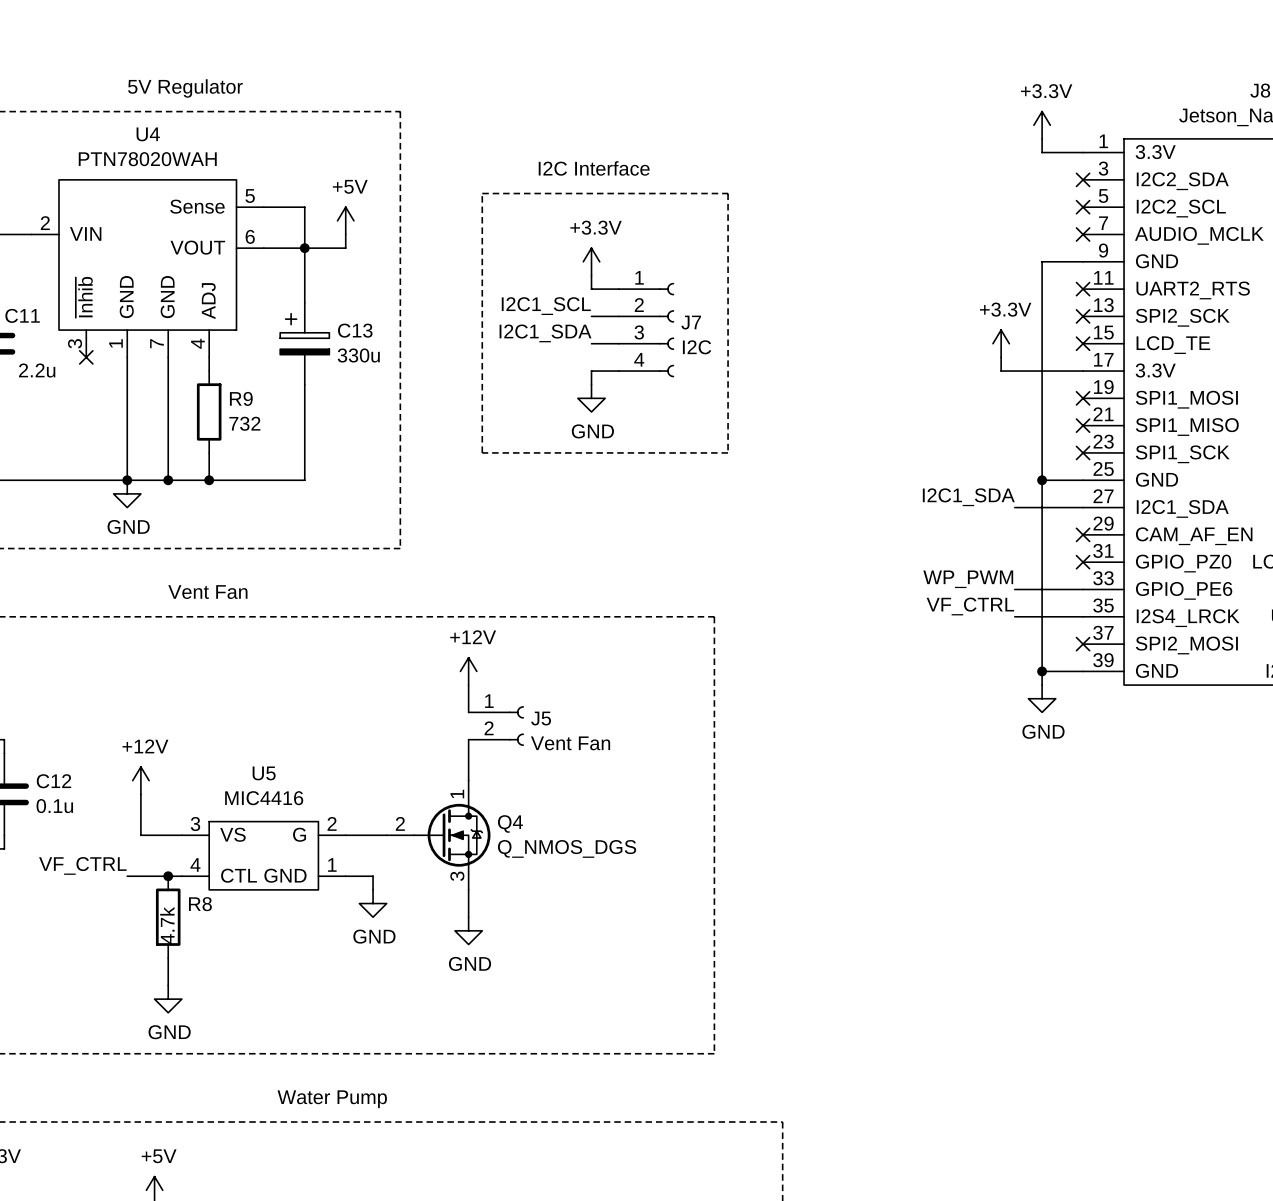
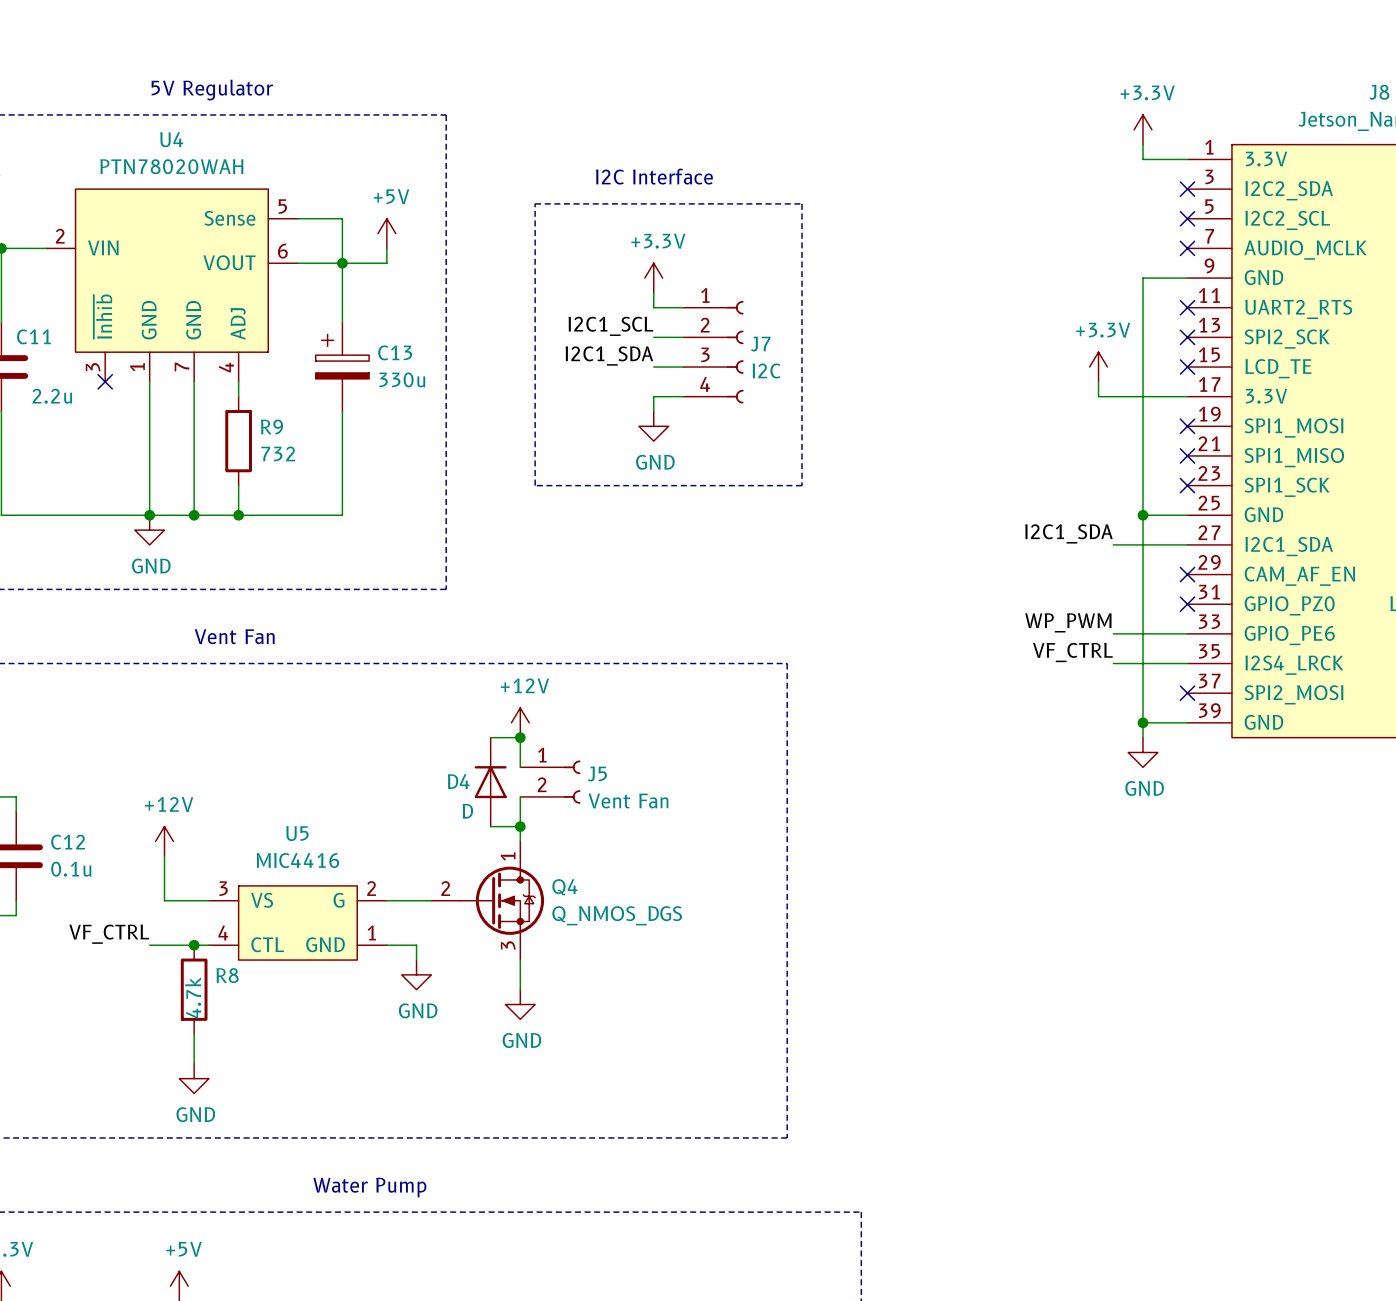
wire: none -> (490, 737) (520, 737)
junction: none -> (520, 737)
D4: none -> D (490, 782)
wire: none -> (490, 826) (520, 826)
junction: none -> (520, 826)

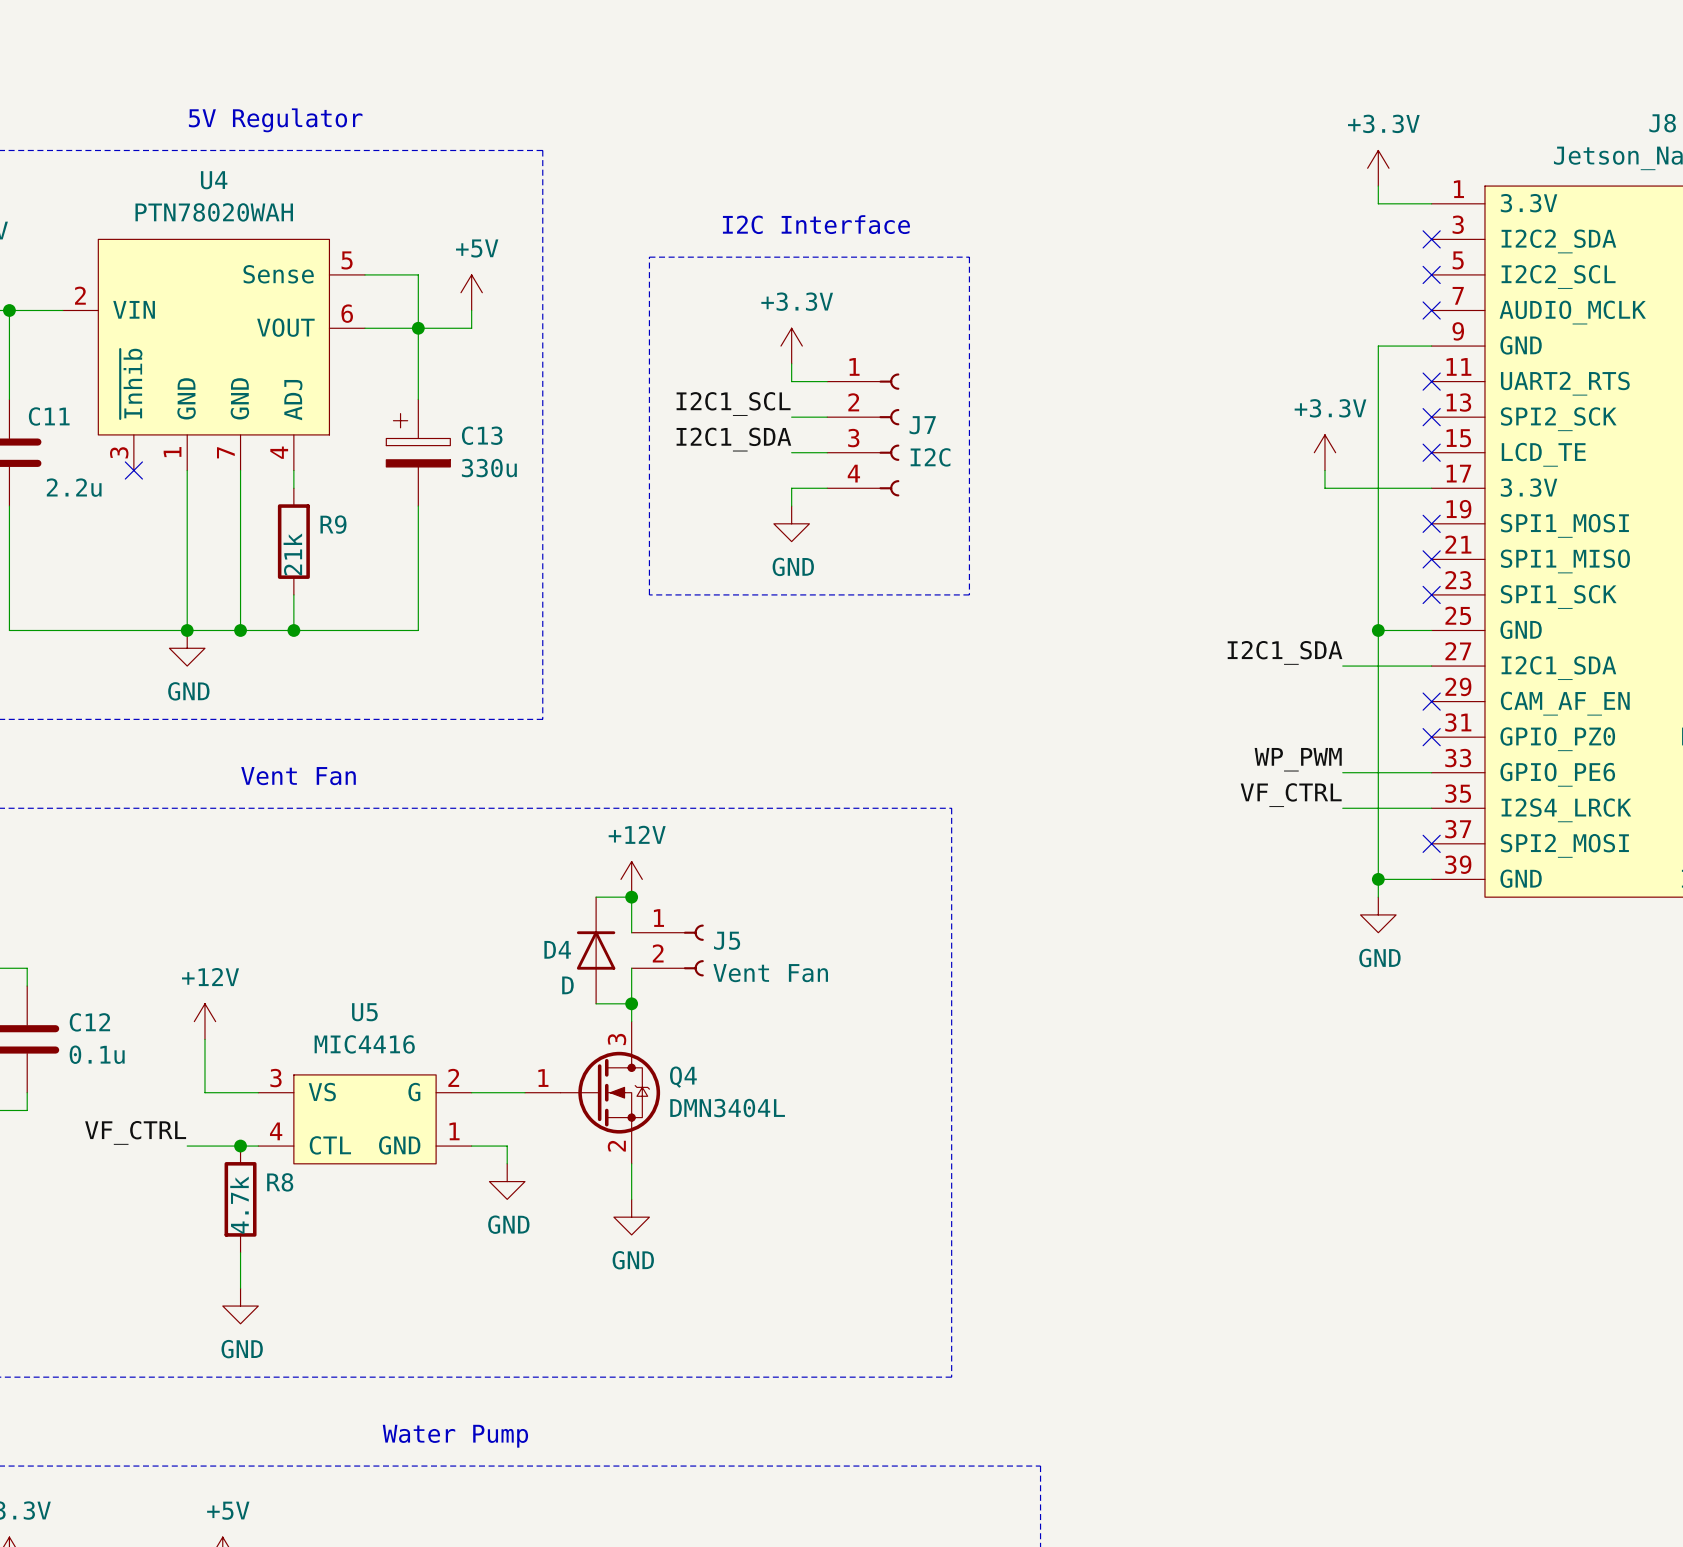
R9 value: 732 (278, 453) -> 21k (292, 554)
Q4 pin number: 1 (508, 856) -> 3 (617, 1039)
Q4 pin number: 2 (445, 888) -> 1 (543, 1078)
Q4 value: Q_NMOS_DGS (617, 915) -> DMN3404L (727, 1108)
Q4 pin number: 3 (508, 945) -> 2 (616, 1146)

